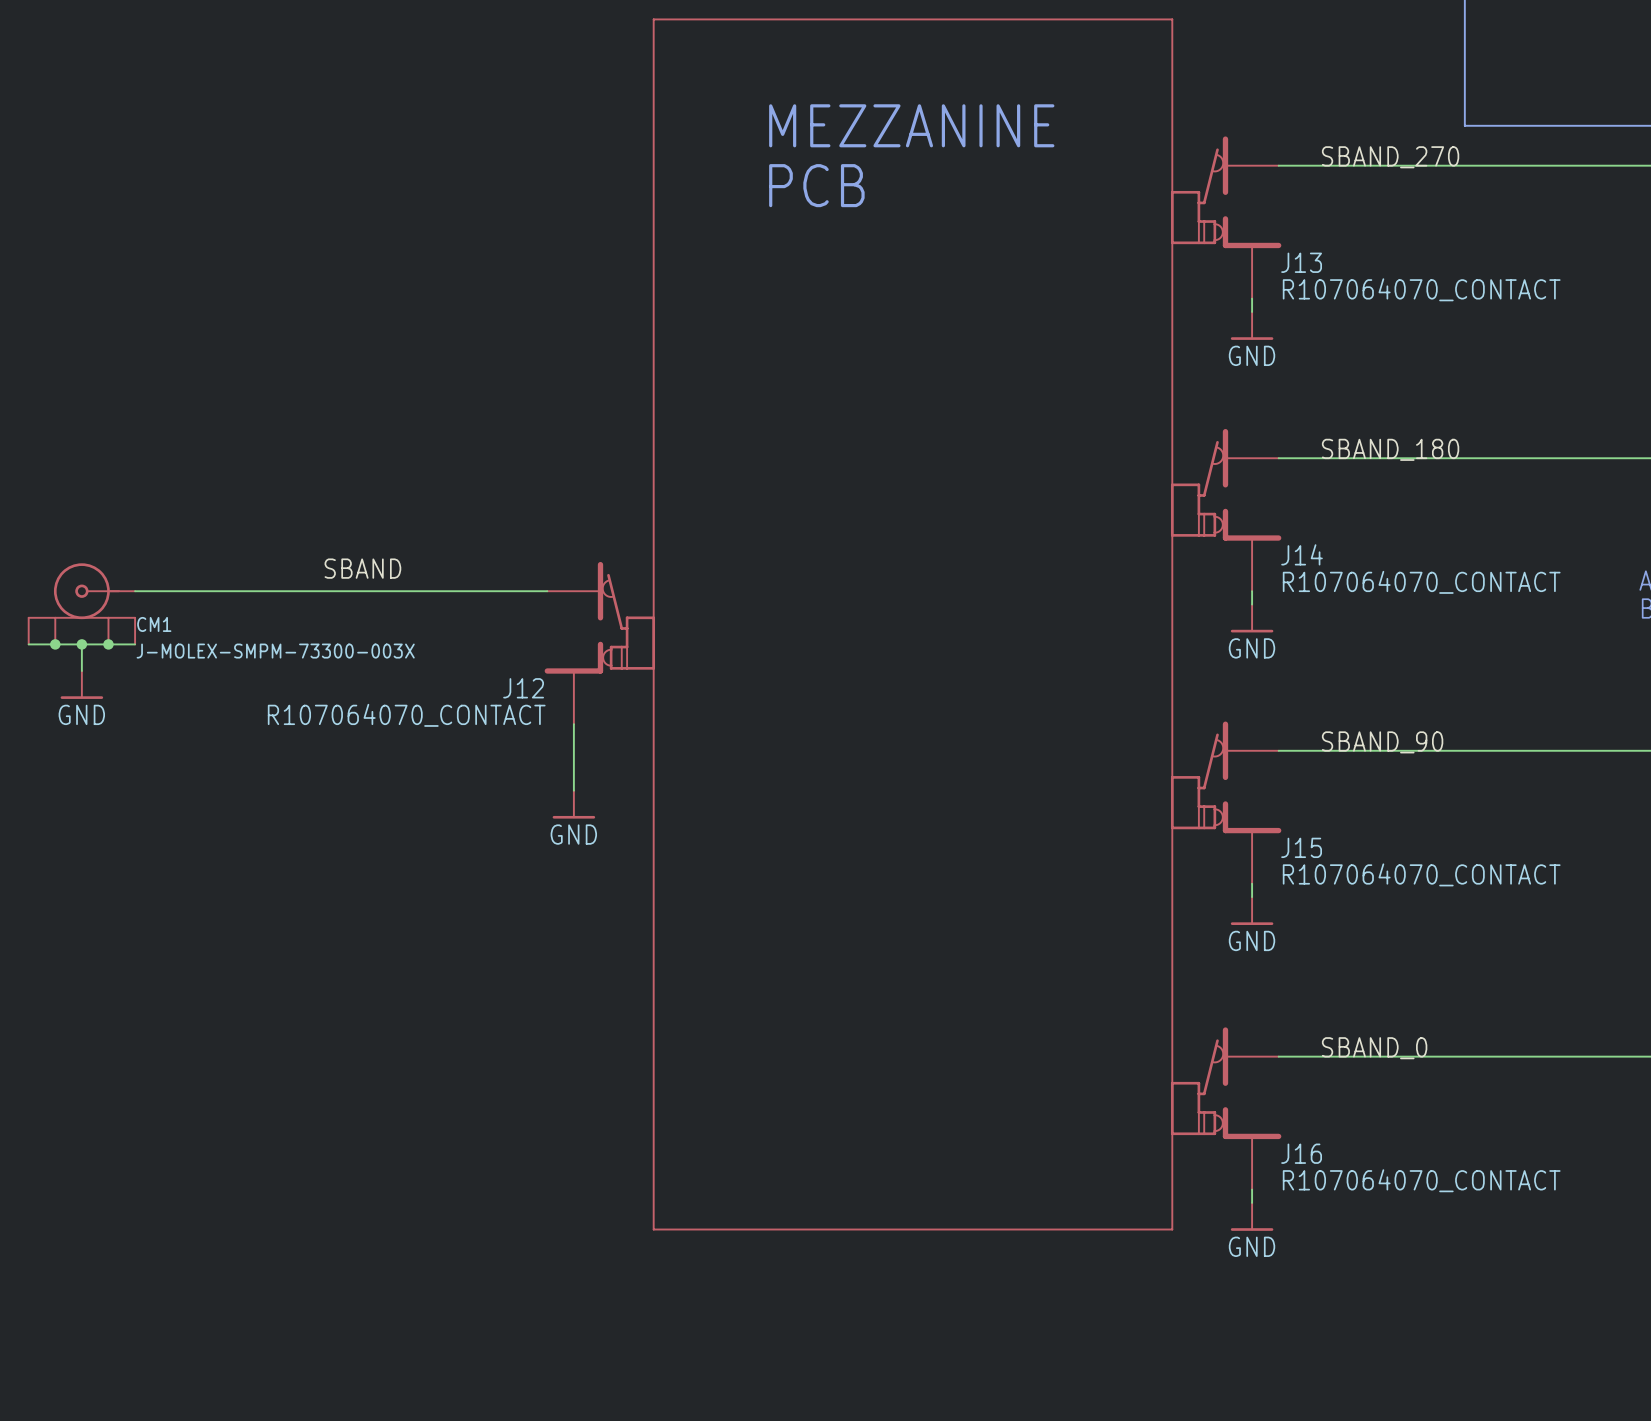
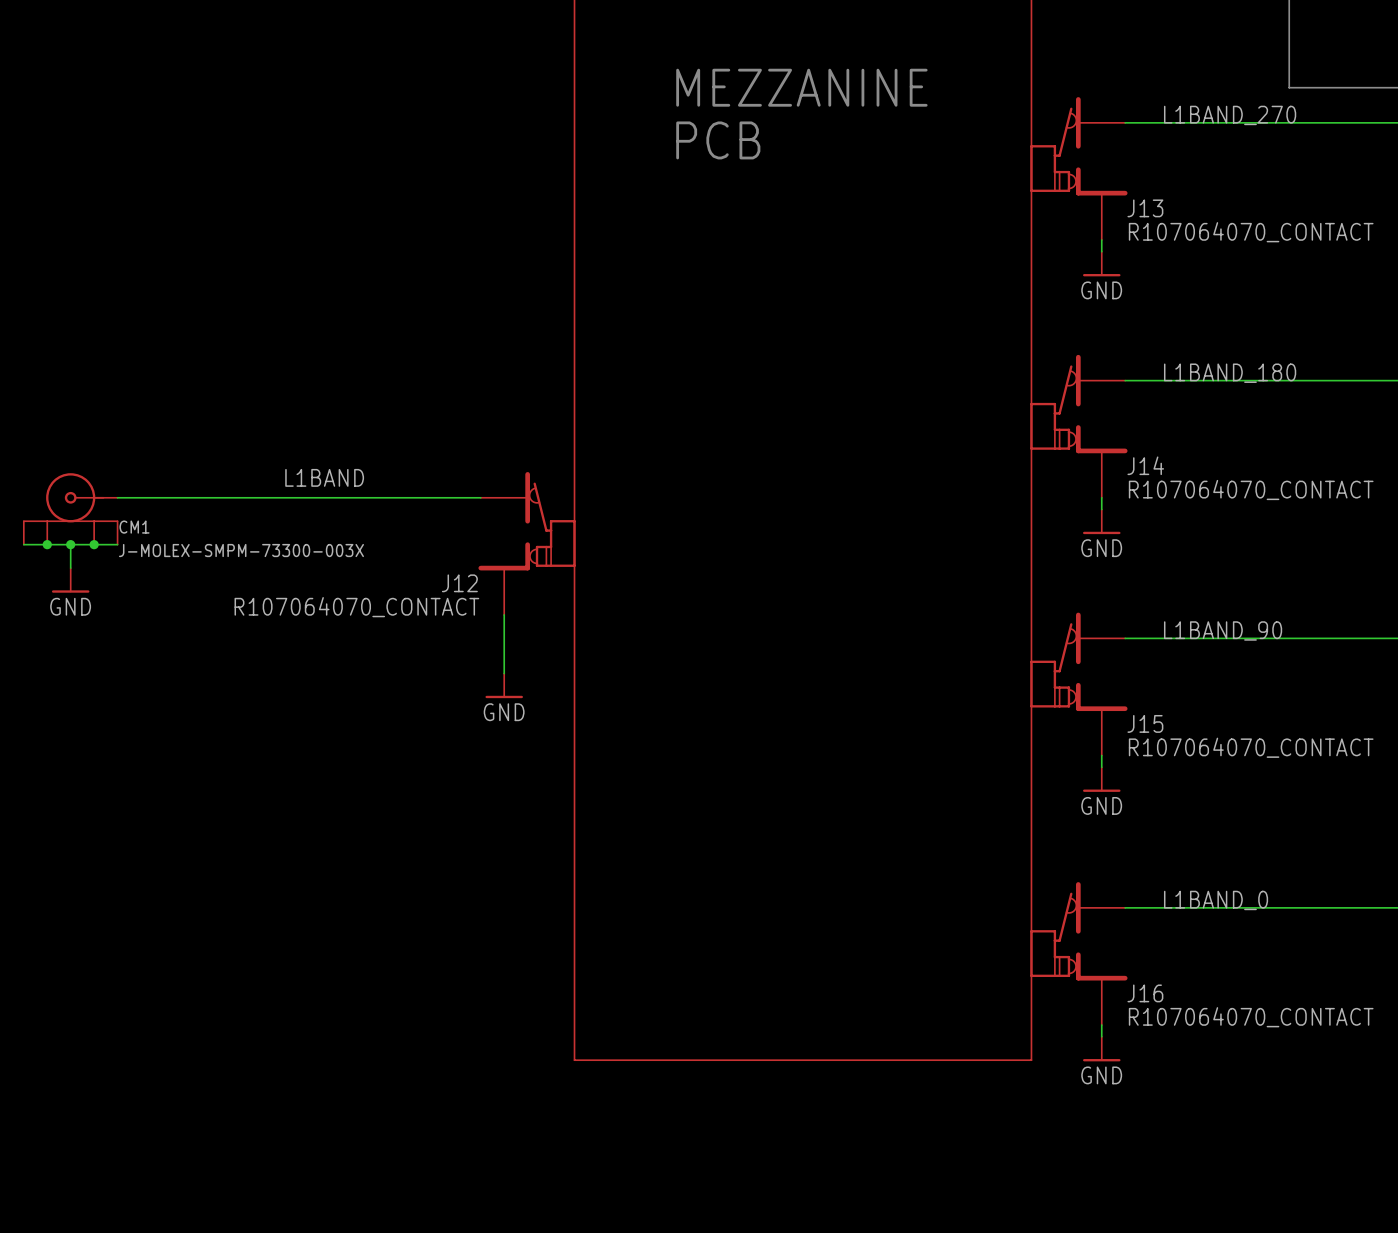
label: SBAND_270 (1390, 157) -> L1BAND_270 (1230, 115)
label: SBAND_180 (1390, 449) -> L1BAND_180 (1230, 373)
label: SBAND (362, 568) -> L1BAND (324, 477)
label: SBAND_90 (1382, 742) -> L1BAND_90 (1223, 630)
label: SBAND_0 (1374, 1048) -> L1BAND_0 (1216, 900)

